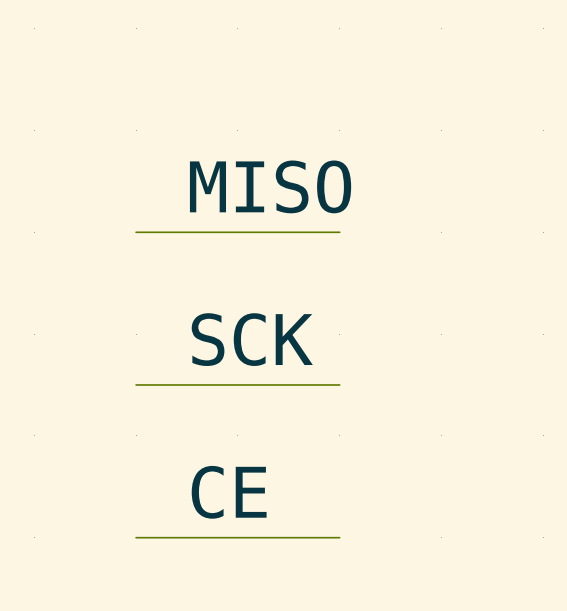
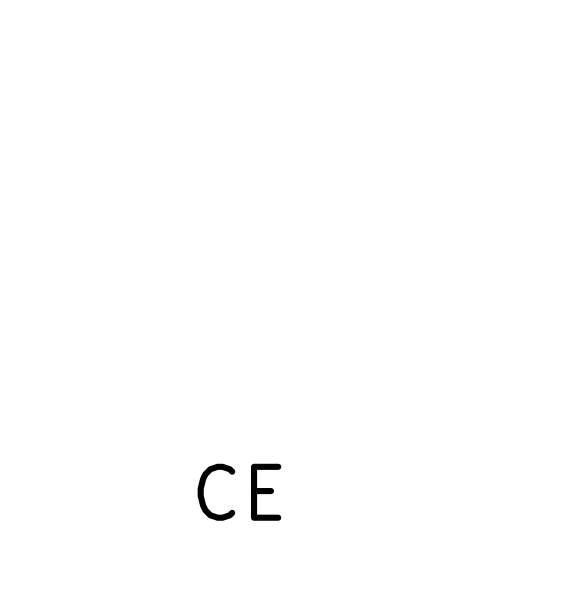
label: MISO (270, 186) -> none
wire: (136, 232) (339, 232) -> none
label: SCK (252, 339) -> none
wire: (136, 384) (339, 384) -> none
wire: (136, 537) (339, 537) -> none

